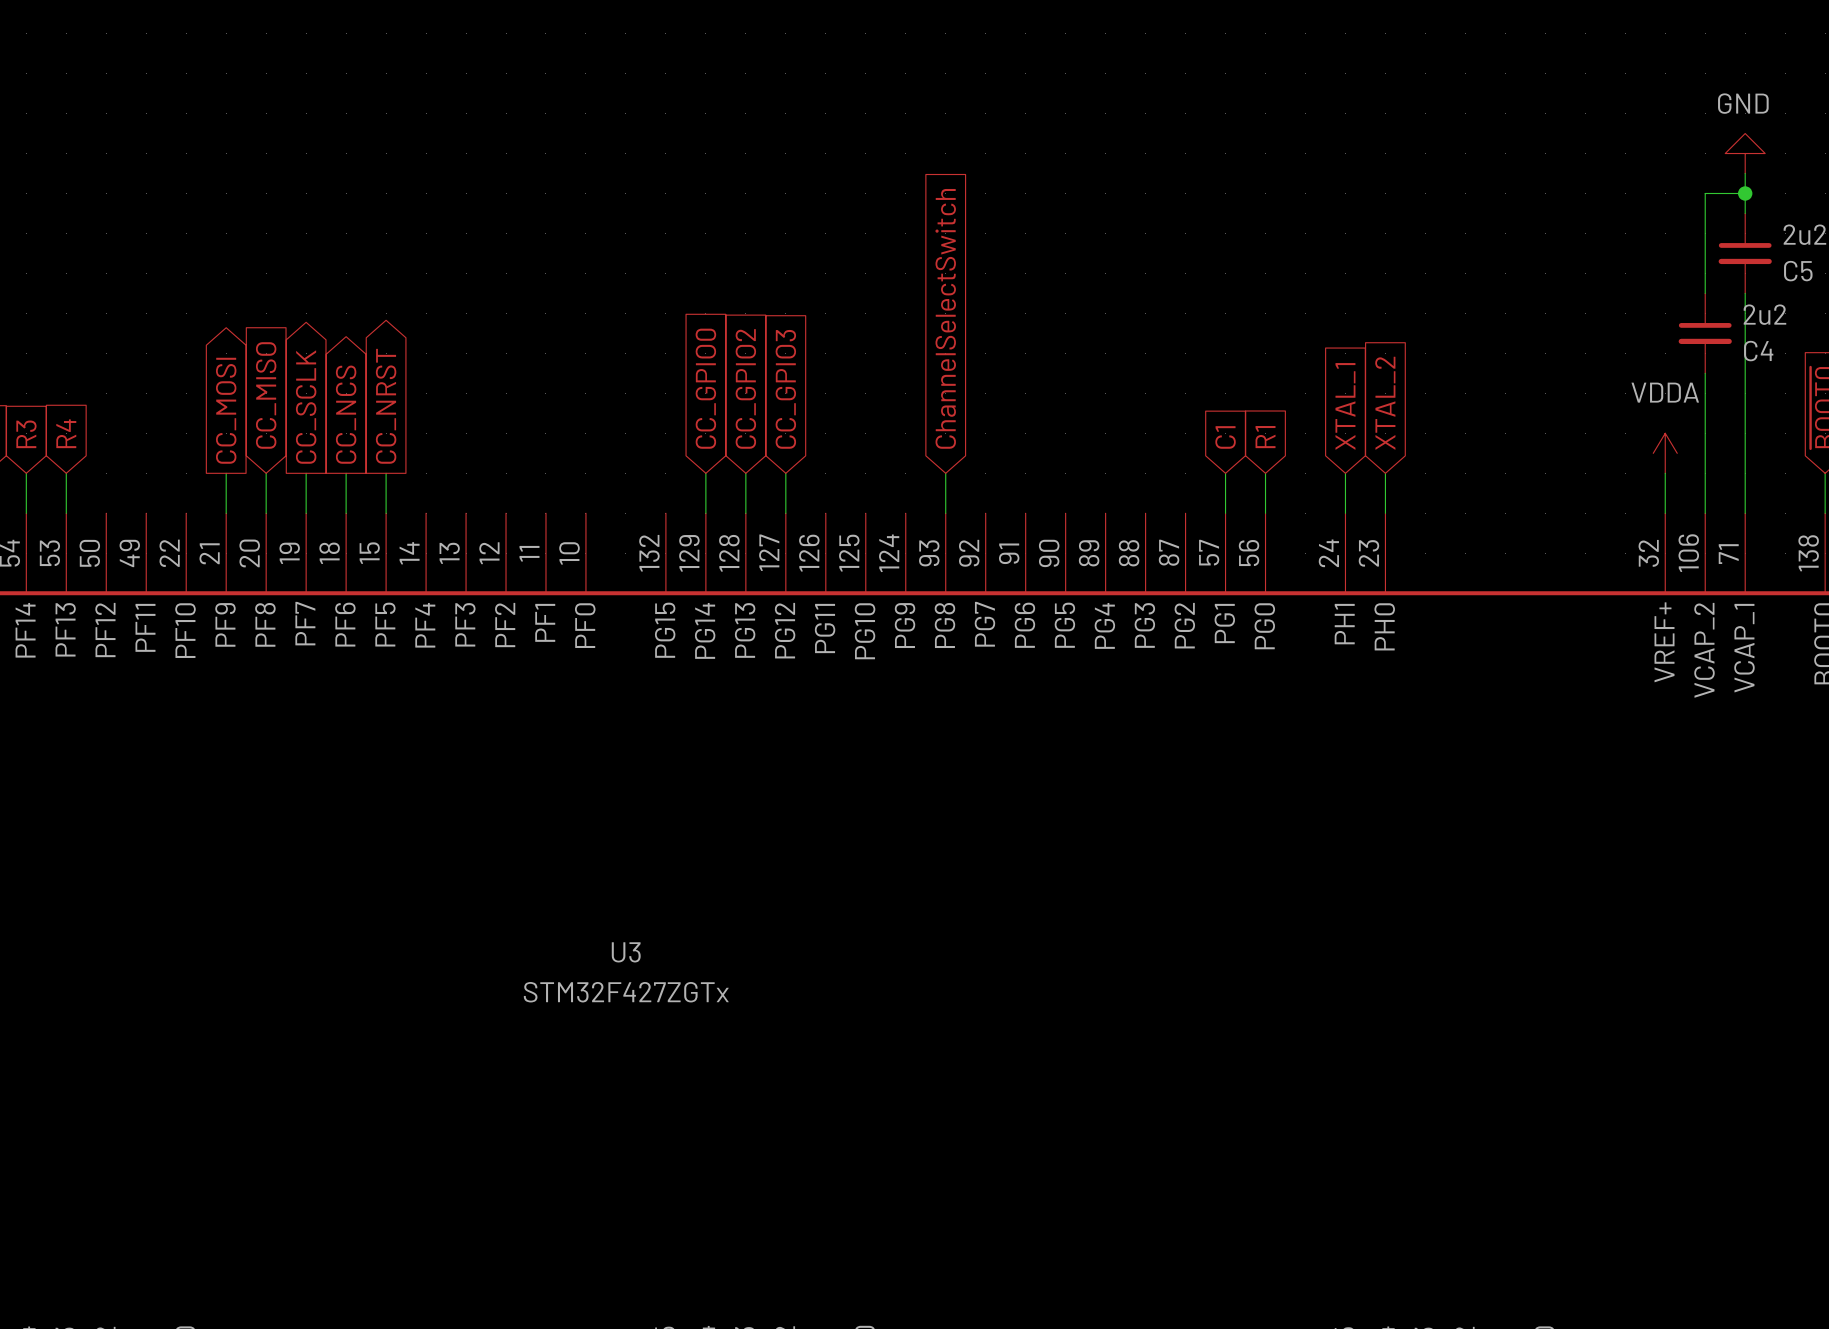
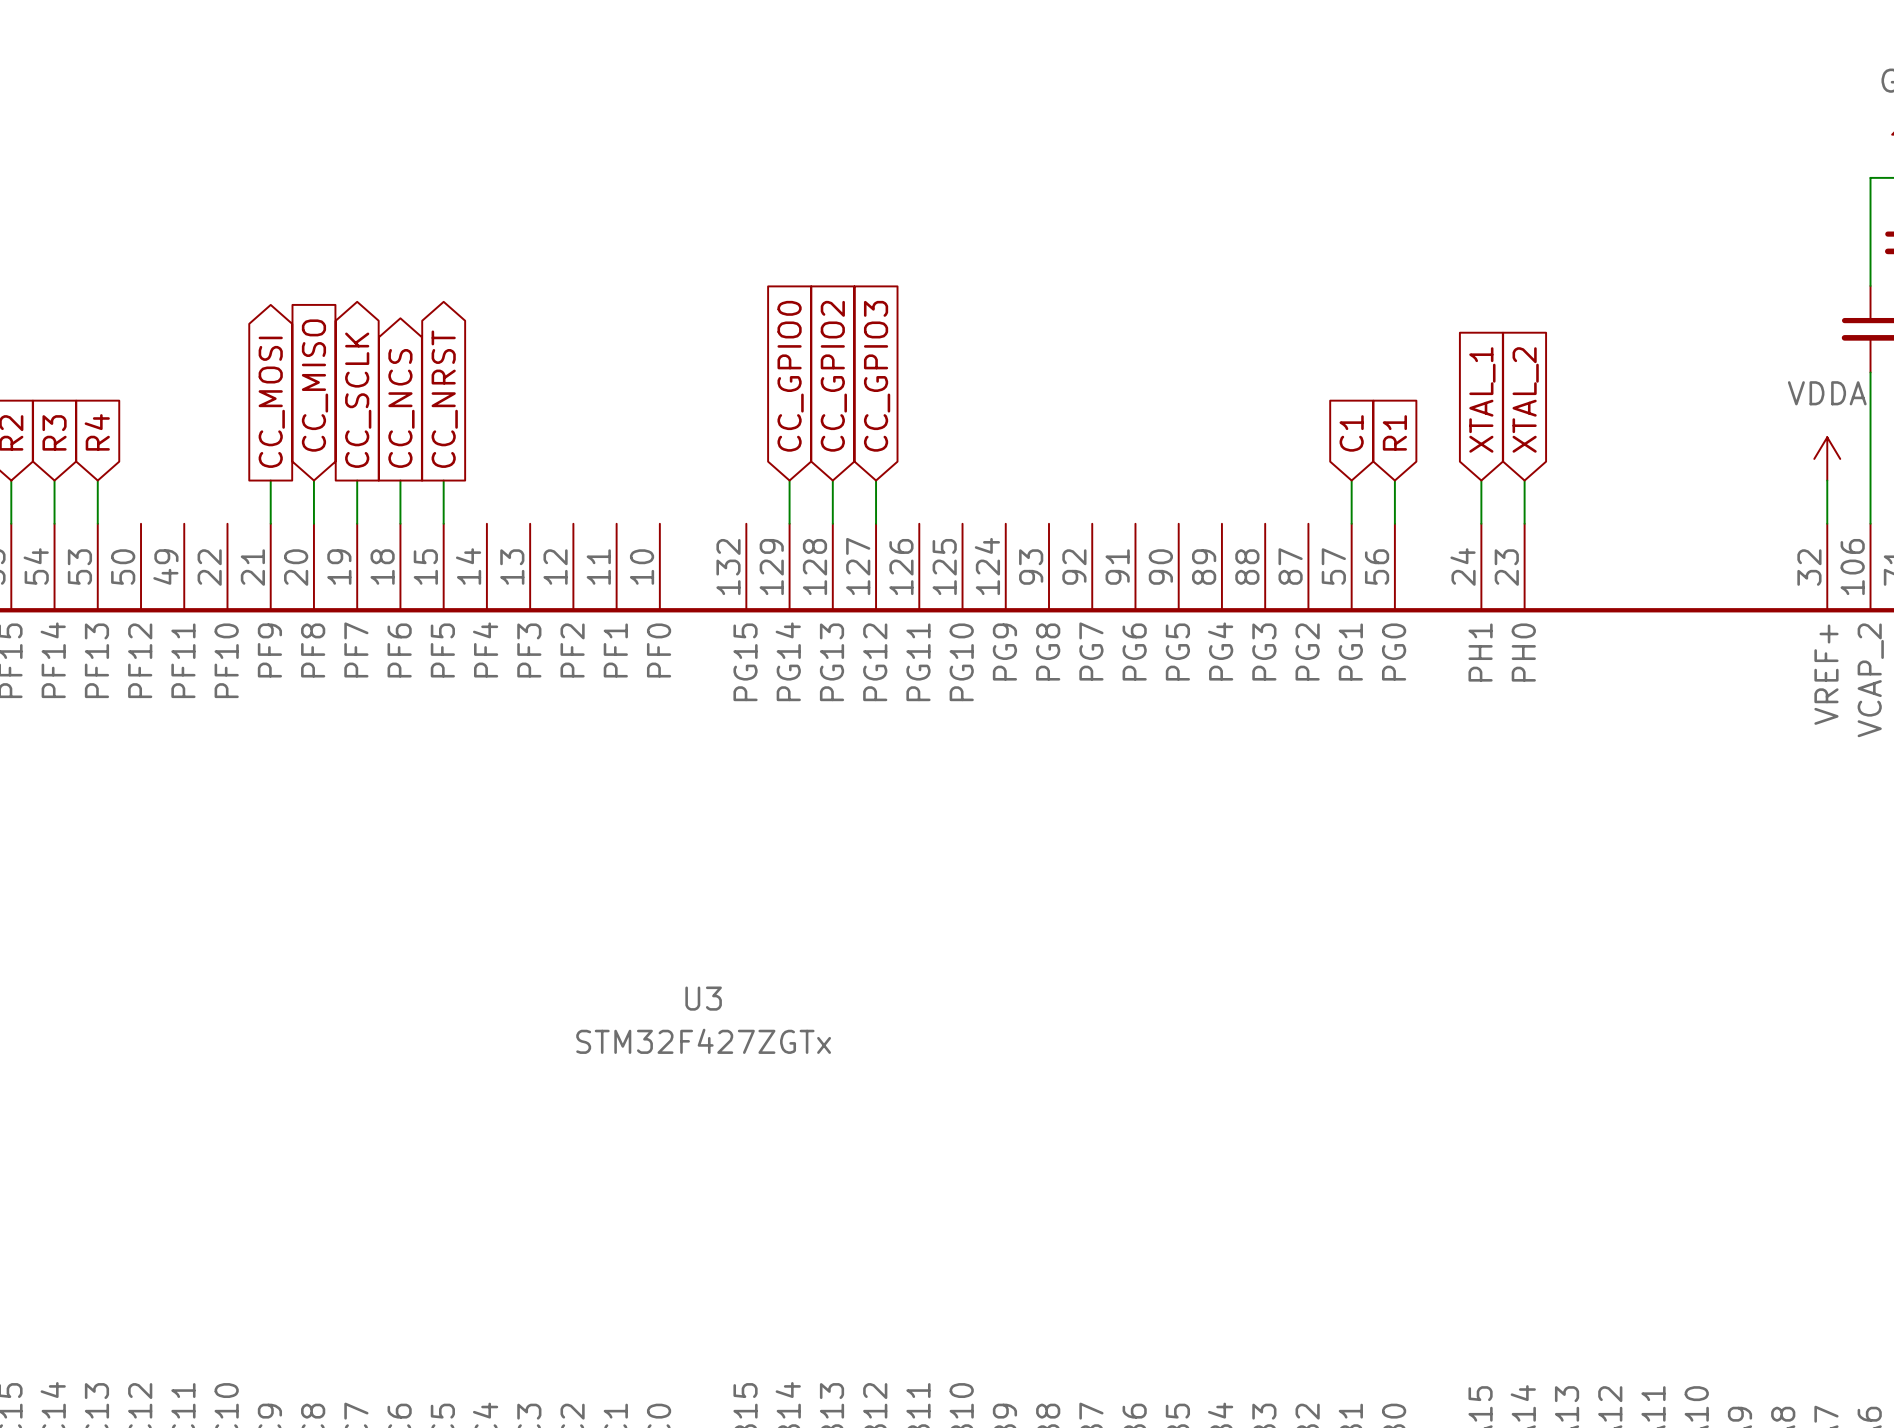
global label: ChannelSelectSwitch (945, 318) -> none
wire: (945, 473) (945, 513) -> none

